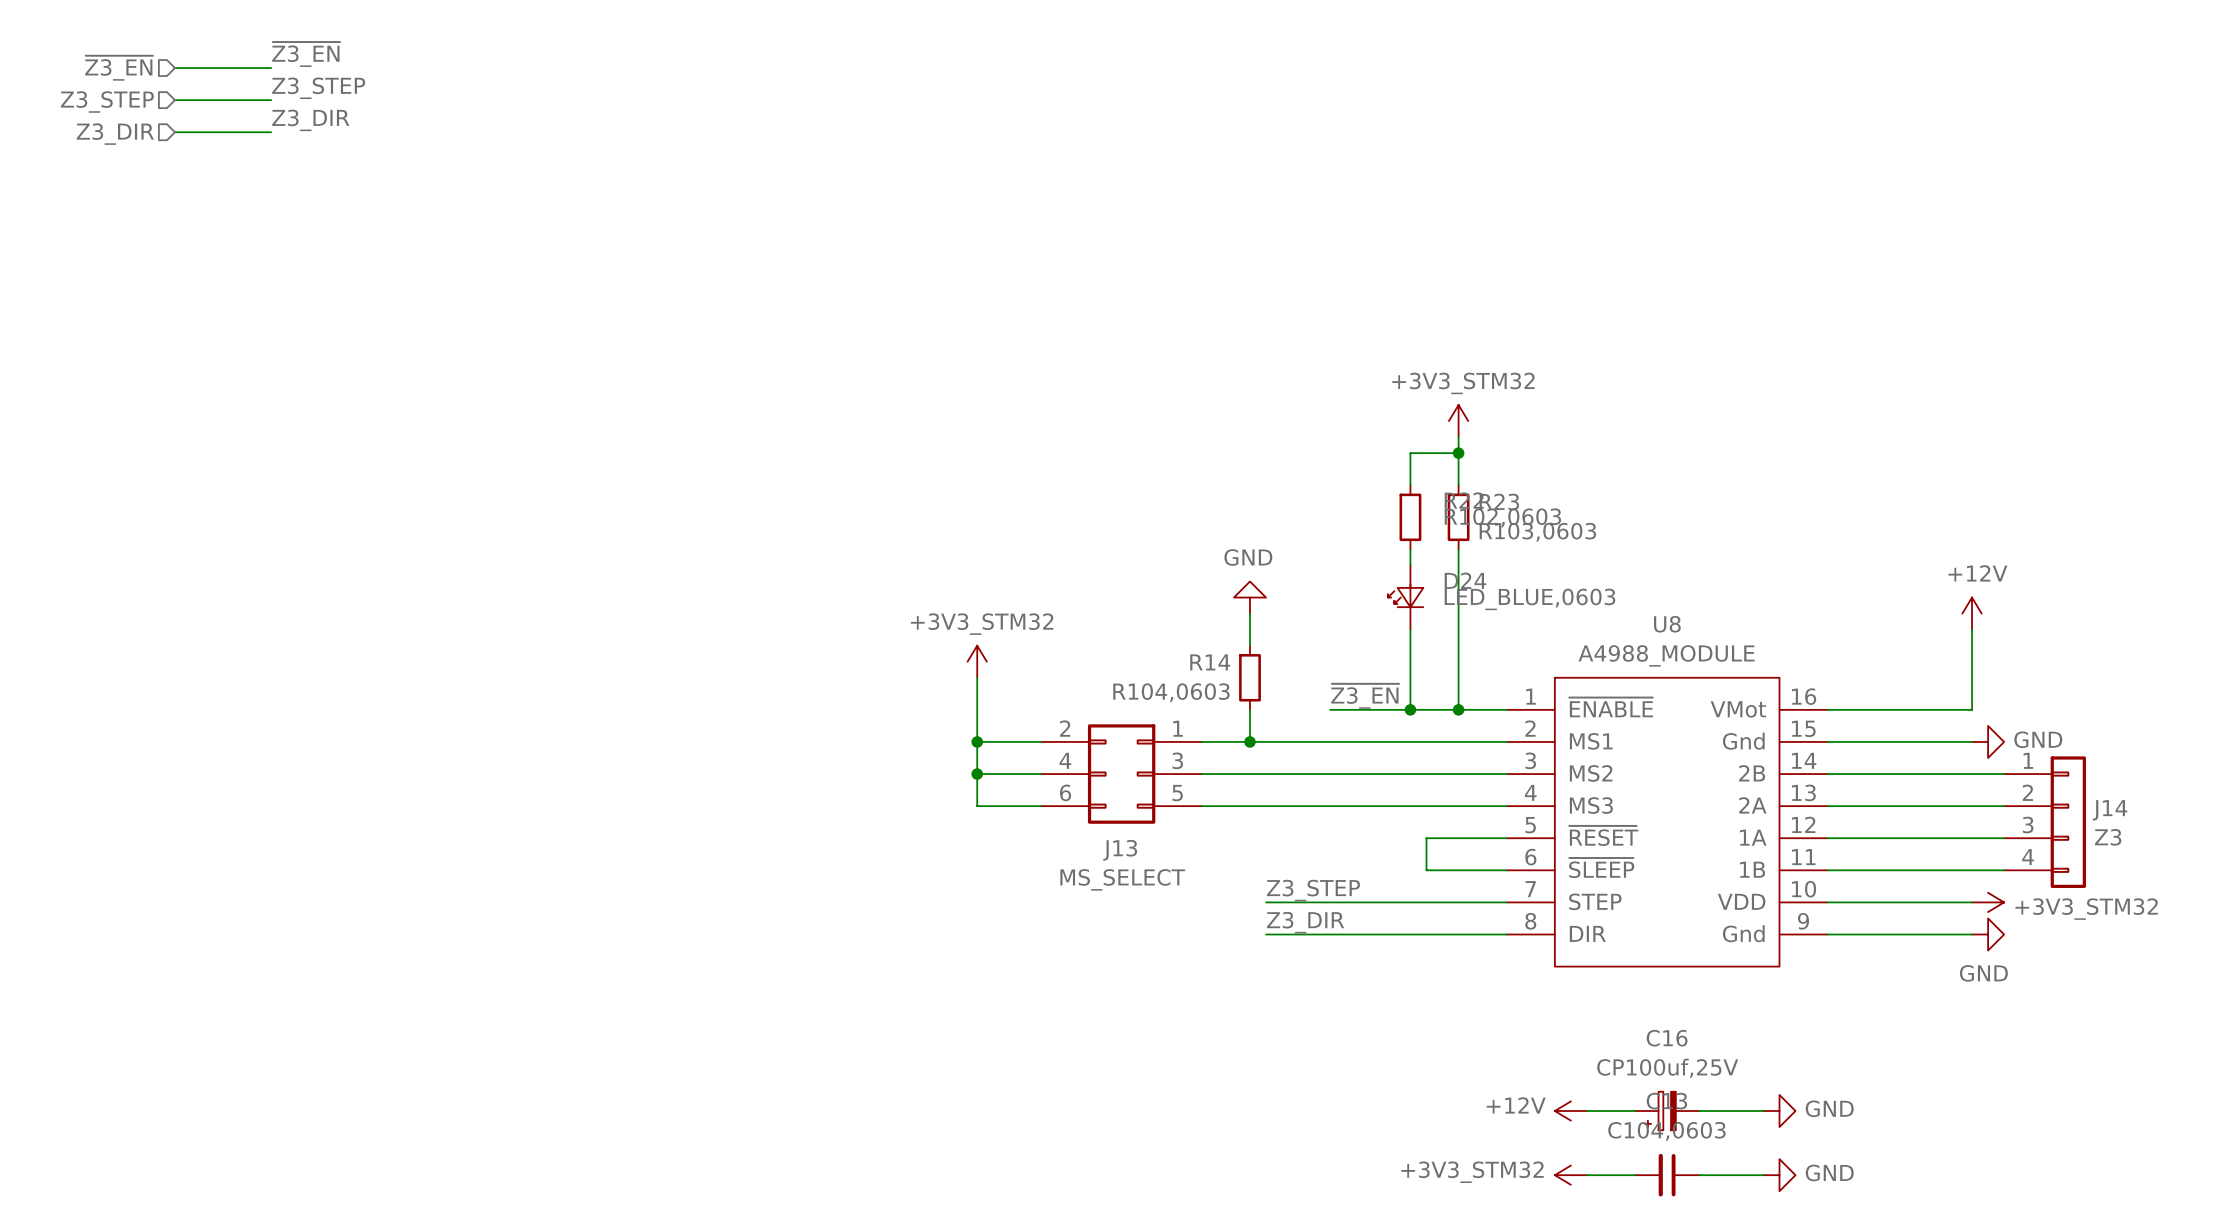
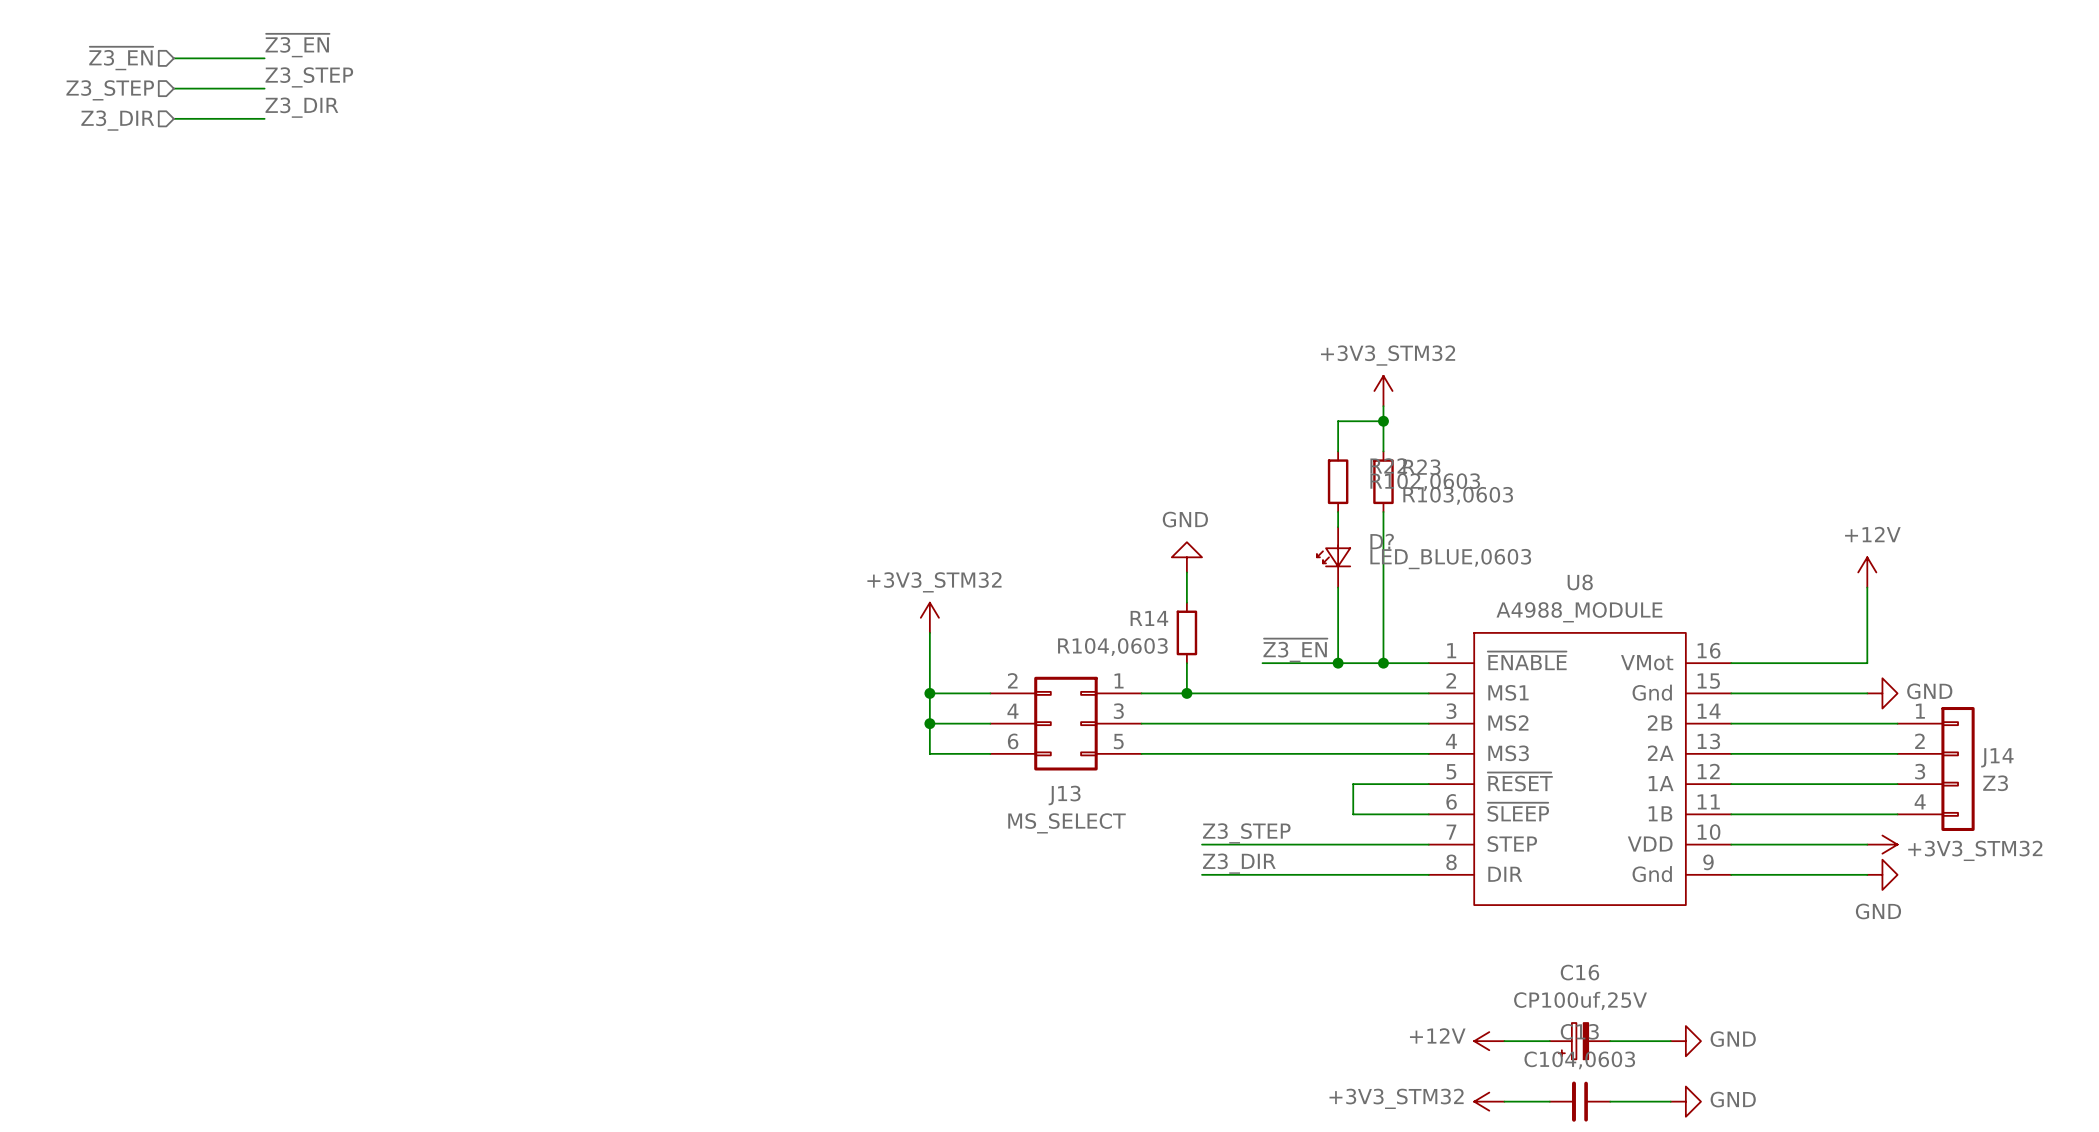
D24 name: D24 (1465, 580) -> D? (1382, 541)

